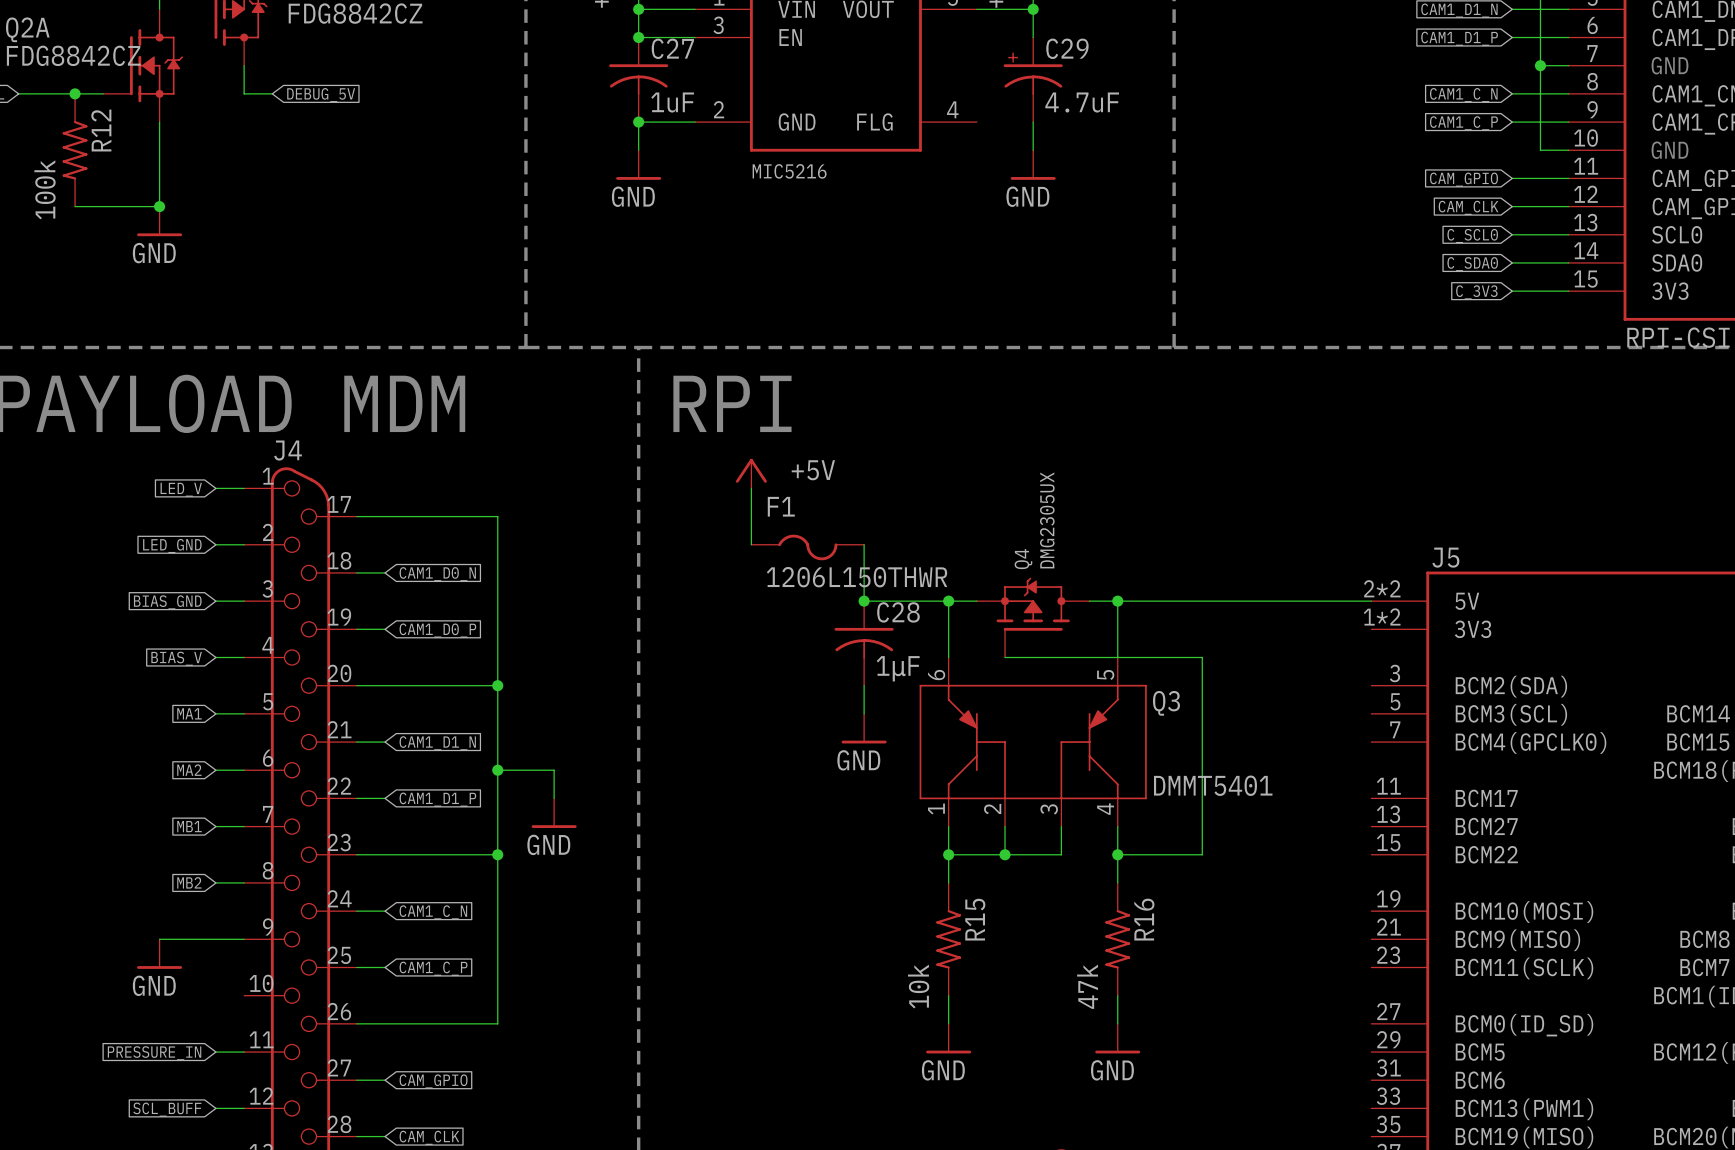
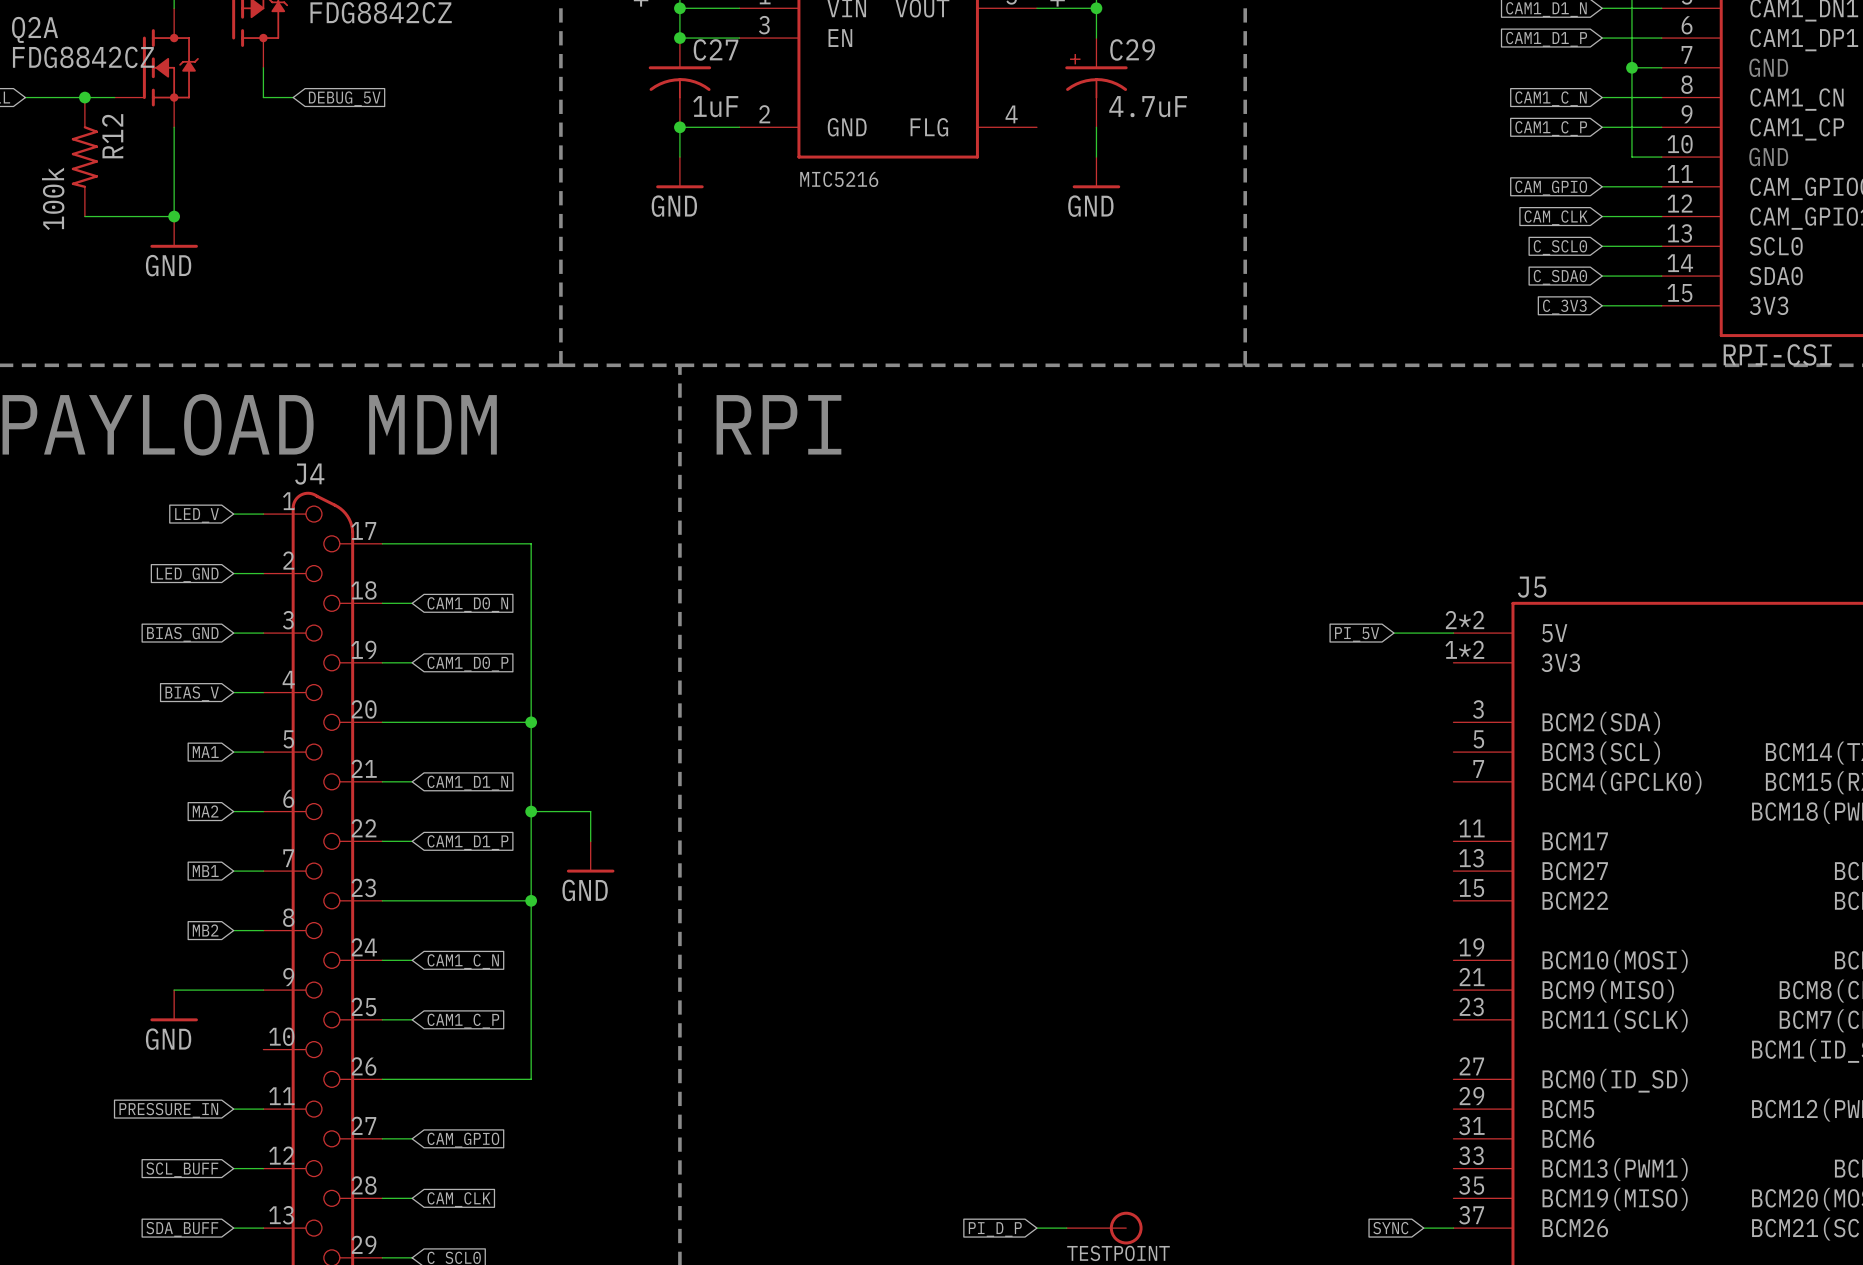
power symbol: +5V (751, 473) -> none
wire: (751, 488) (751, 544) -> none
wire: (864, 544) (864, 601) (976, 601) -> none
F1: 1206L150THWR (807, 547) -> none
junction: (864, 601) -> none
wire: (948, 601) (948, 657) -> none
junction: (948, 601) -> none
wire: (1089, 601) (1315, 601) -> none
wire: (1117, 601) (1117, 657) -> none
junction: (1117, 601) -> none
global label: none -> PI_5V (1357, 634)
Q4: DMG2305UX (1033, 617) -> none
C28: 1μF (864, 643) -> none
wire: (1005, 657) (1202, 657) (1202, 854) (1117, 854) -> none
wire: (864, 685) (864, 713) -> none
power symbol: GND (864, 728) -> none
Q3: DMMT5401 (1033, 742) -> none
wire: (948, 826) (948, 882) -> none
wire: (1005, 826) (1005, 854) -> none
wire: (1061, 826) (1061, 854) (948, 854) -> none
wire: (1117, 826) (1117, 882) -> none
junction: (948, 854) -> none
junction: (1005, 854) -> none
junction: (1117, 854) -> none
R15: 10k (948, 939) -> none
R16: 47k (1117, 939) -> none
wire: (948, 995) (948, 1023) -> none
wire: (1117, 995) (1117, 1023) -> none
power symbol: GND (948, 1038) -> none
power symbol: GND (1117, 1038) -> none

